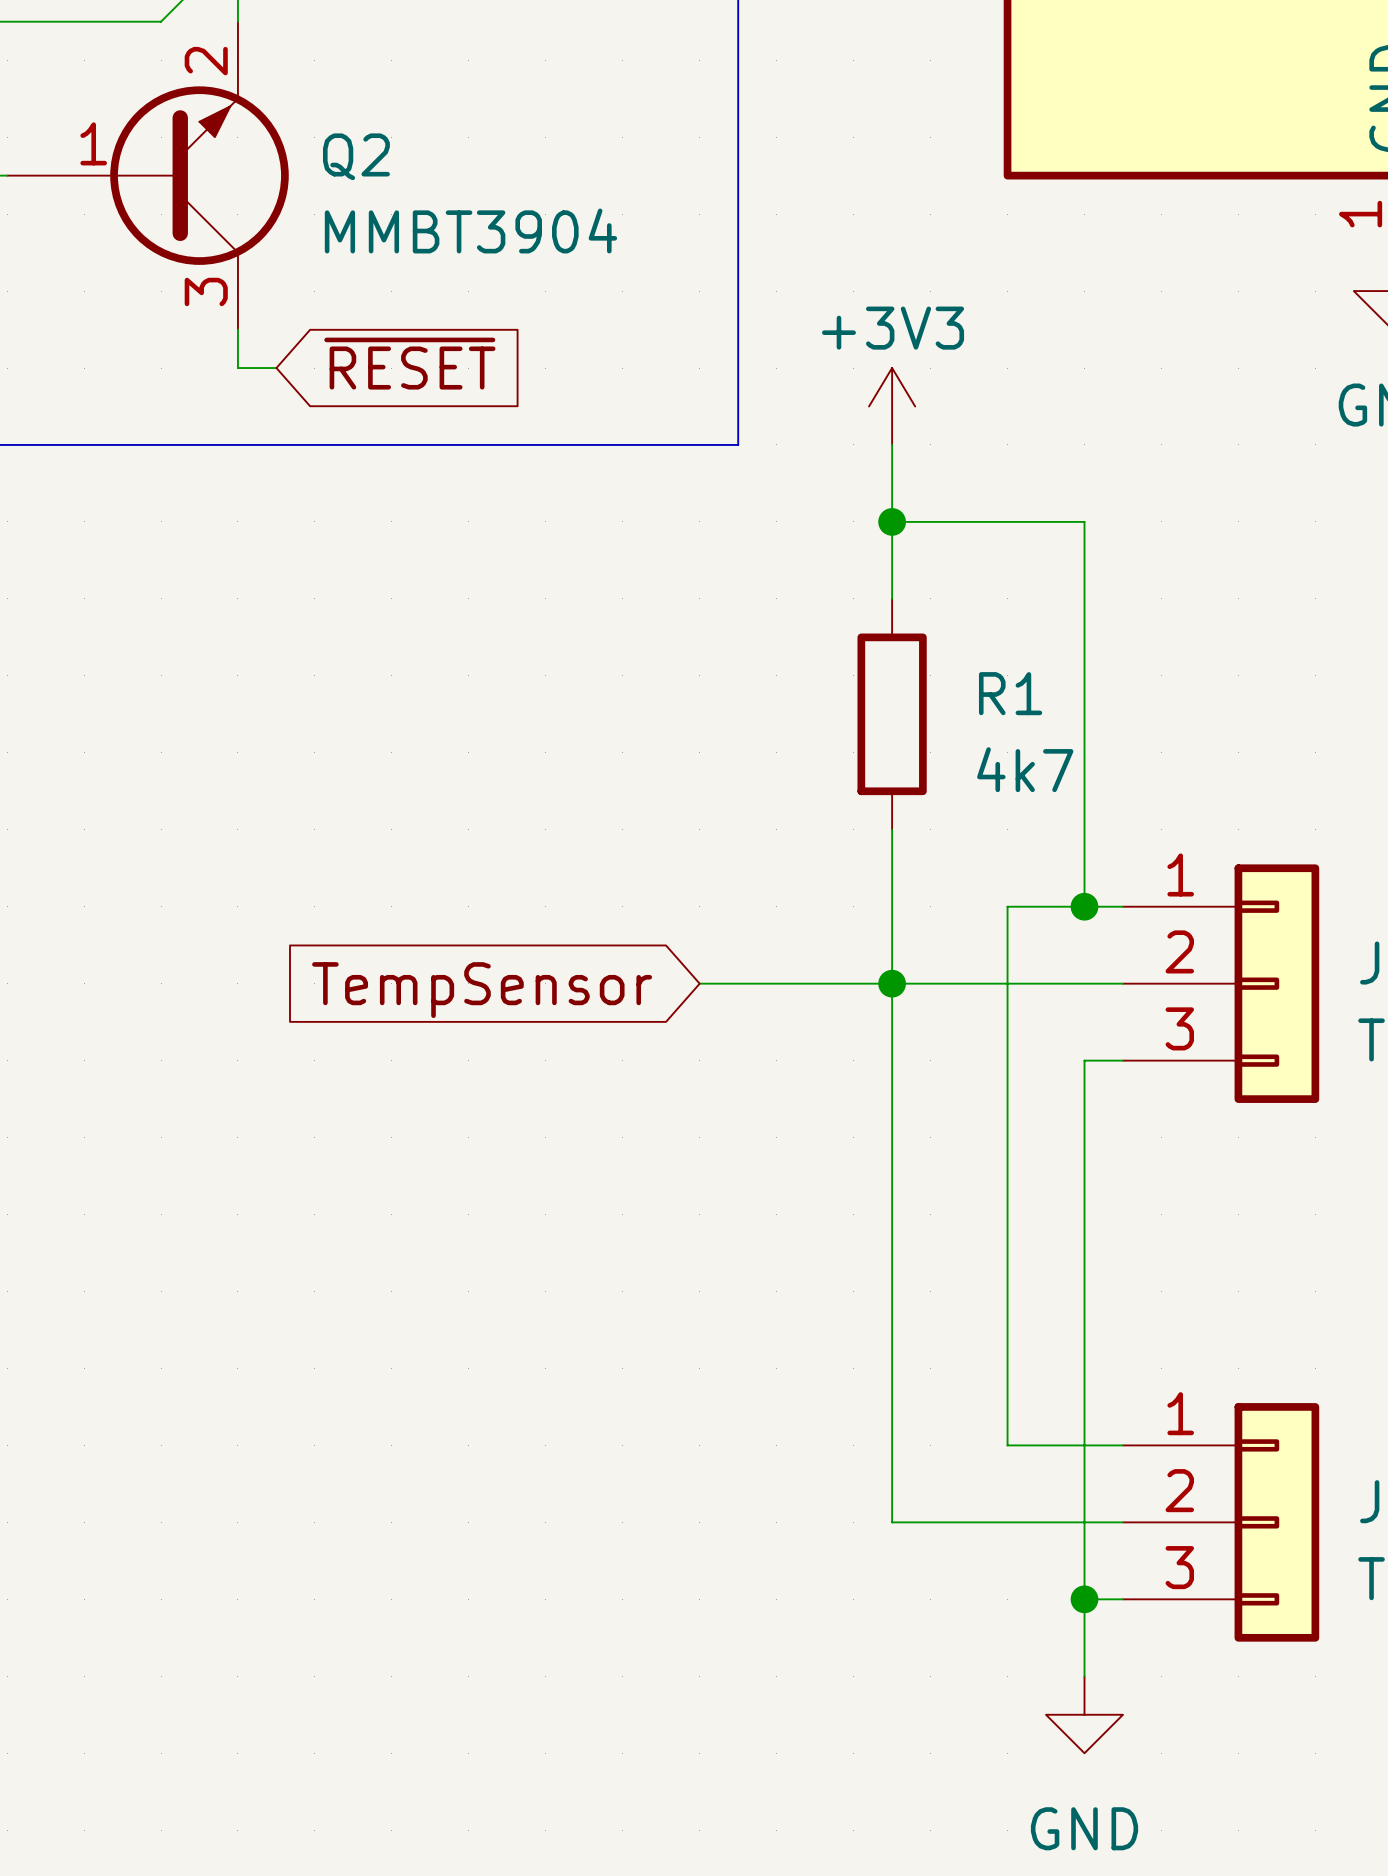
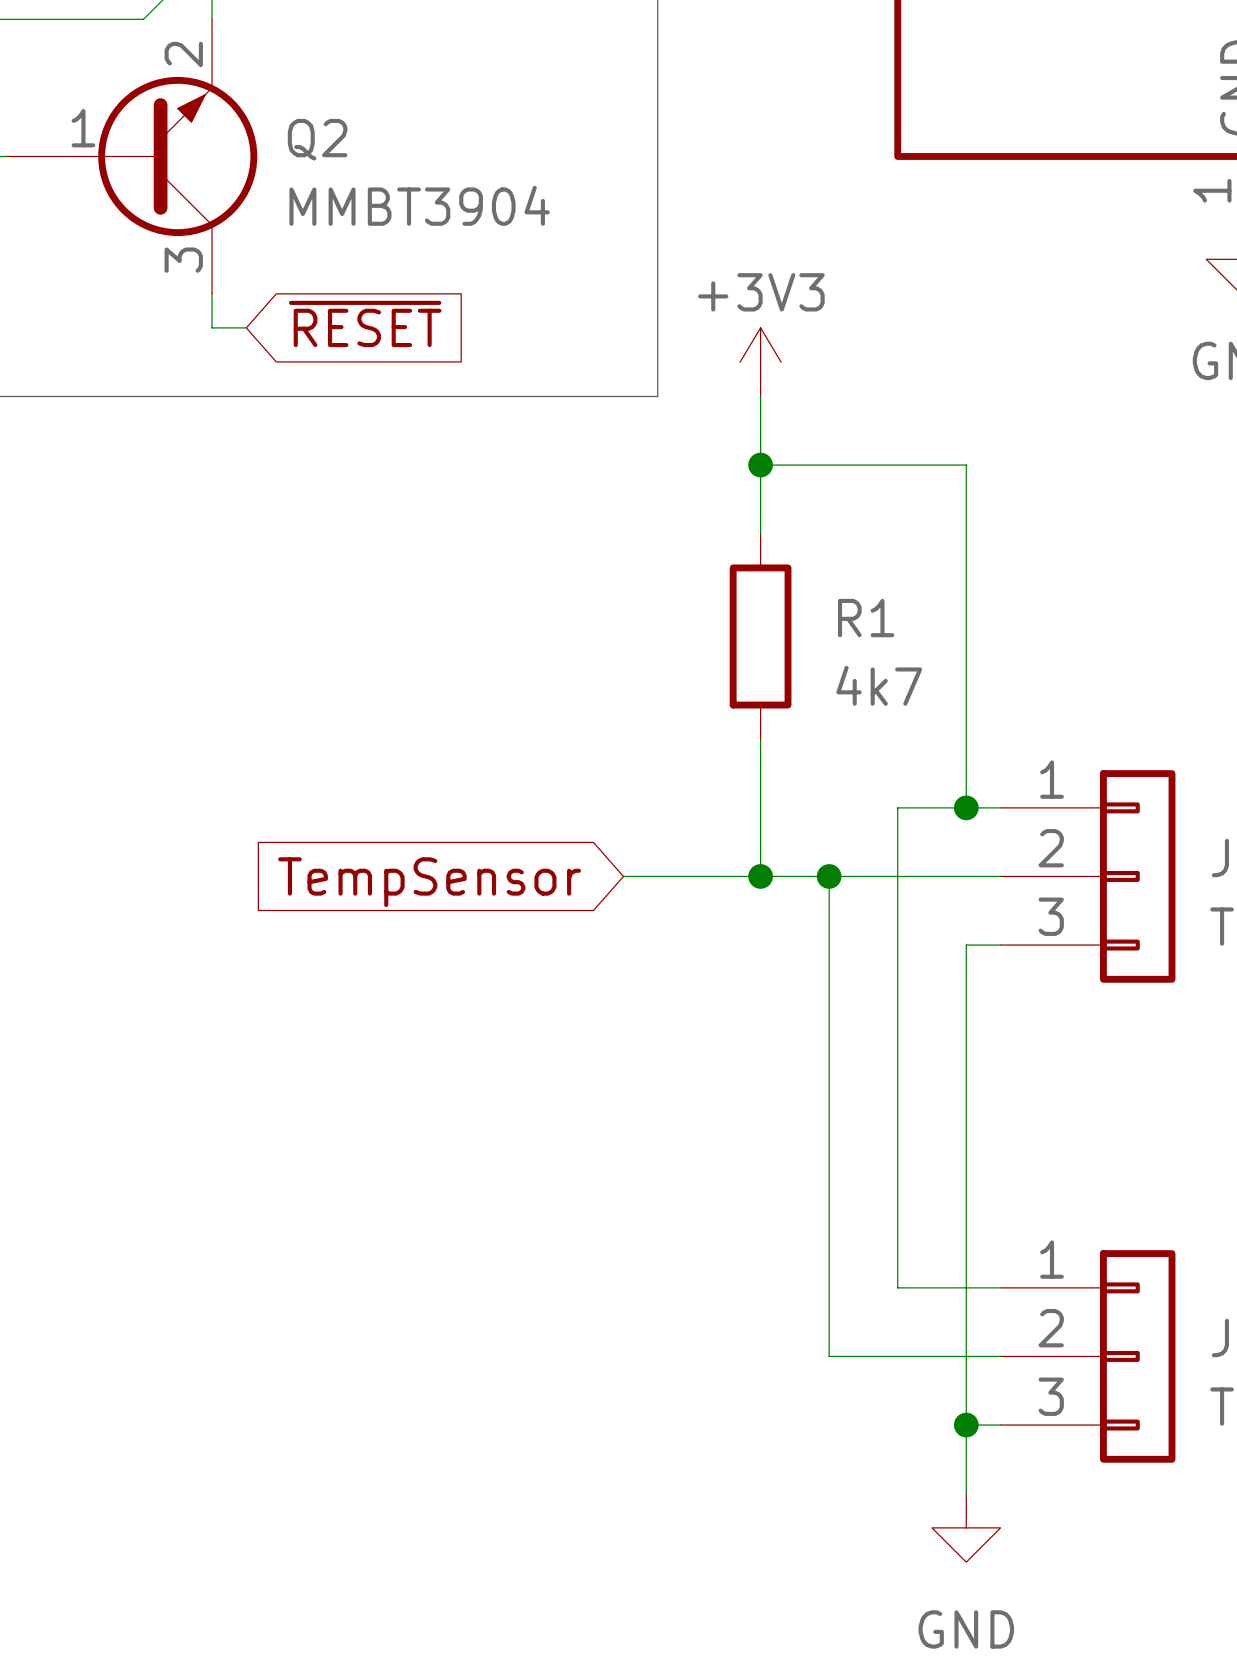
power symbol position: +3V3 (892, 406) -> +3V3 (760, 362)
wire: (892, 444) (892, 598) -> (760, 396) (760, 533)
wire: none -> (760, 465) (794, 465)
junction position: (892, 521) -> (760, 465)
R1 position: (892, 714) -> (760, 636)
wire: none -> (760, 739) (760, 876)
wire: (892, 829) (892, 1522) (930, 1522) -> (829, 876) (829, 1356)
junction: none -> (760, 876)
junction: (892, 983) -> none
junction: none -> (829, 876)

